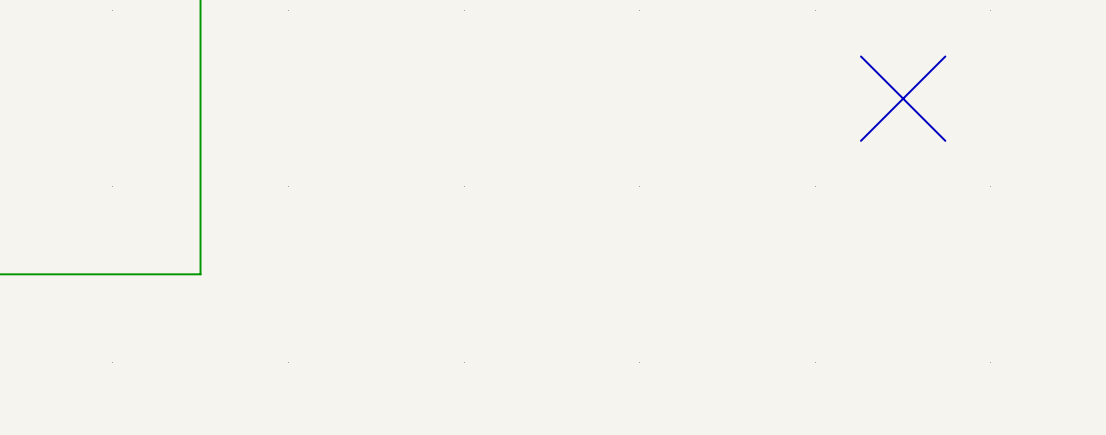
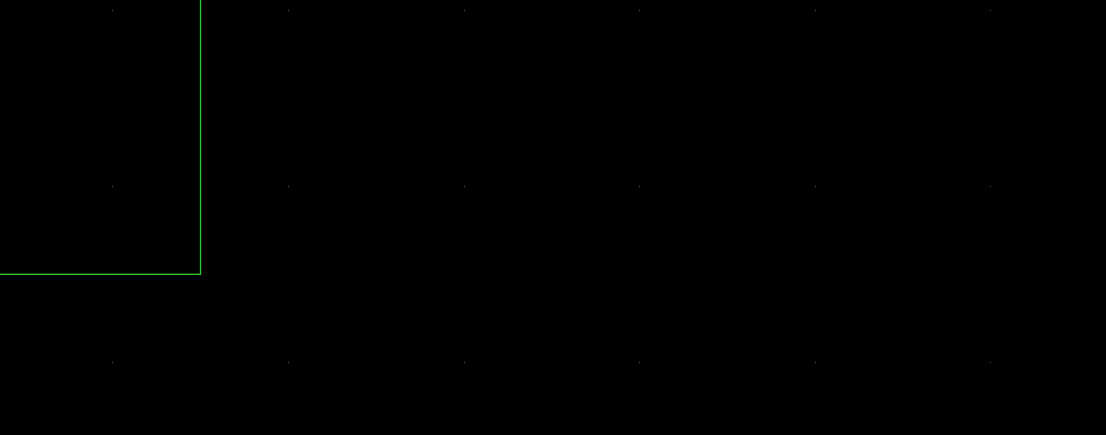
no-connect mark: (903, 98) -> none

